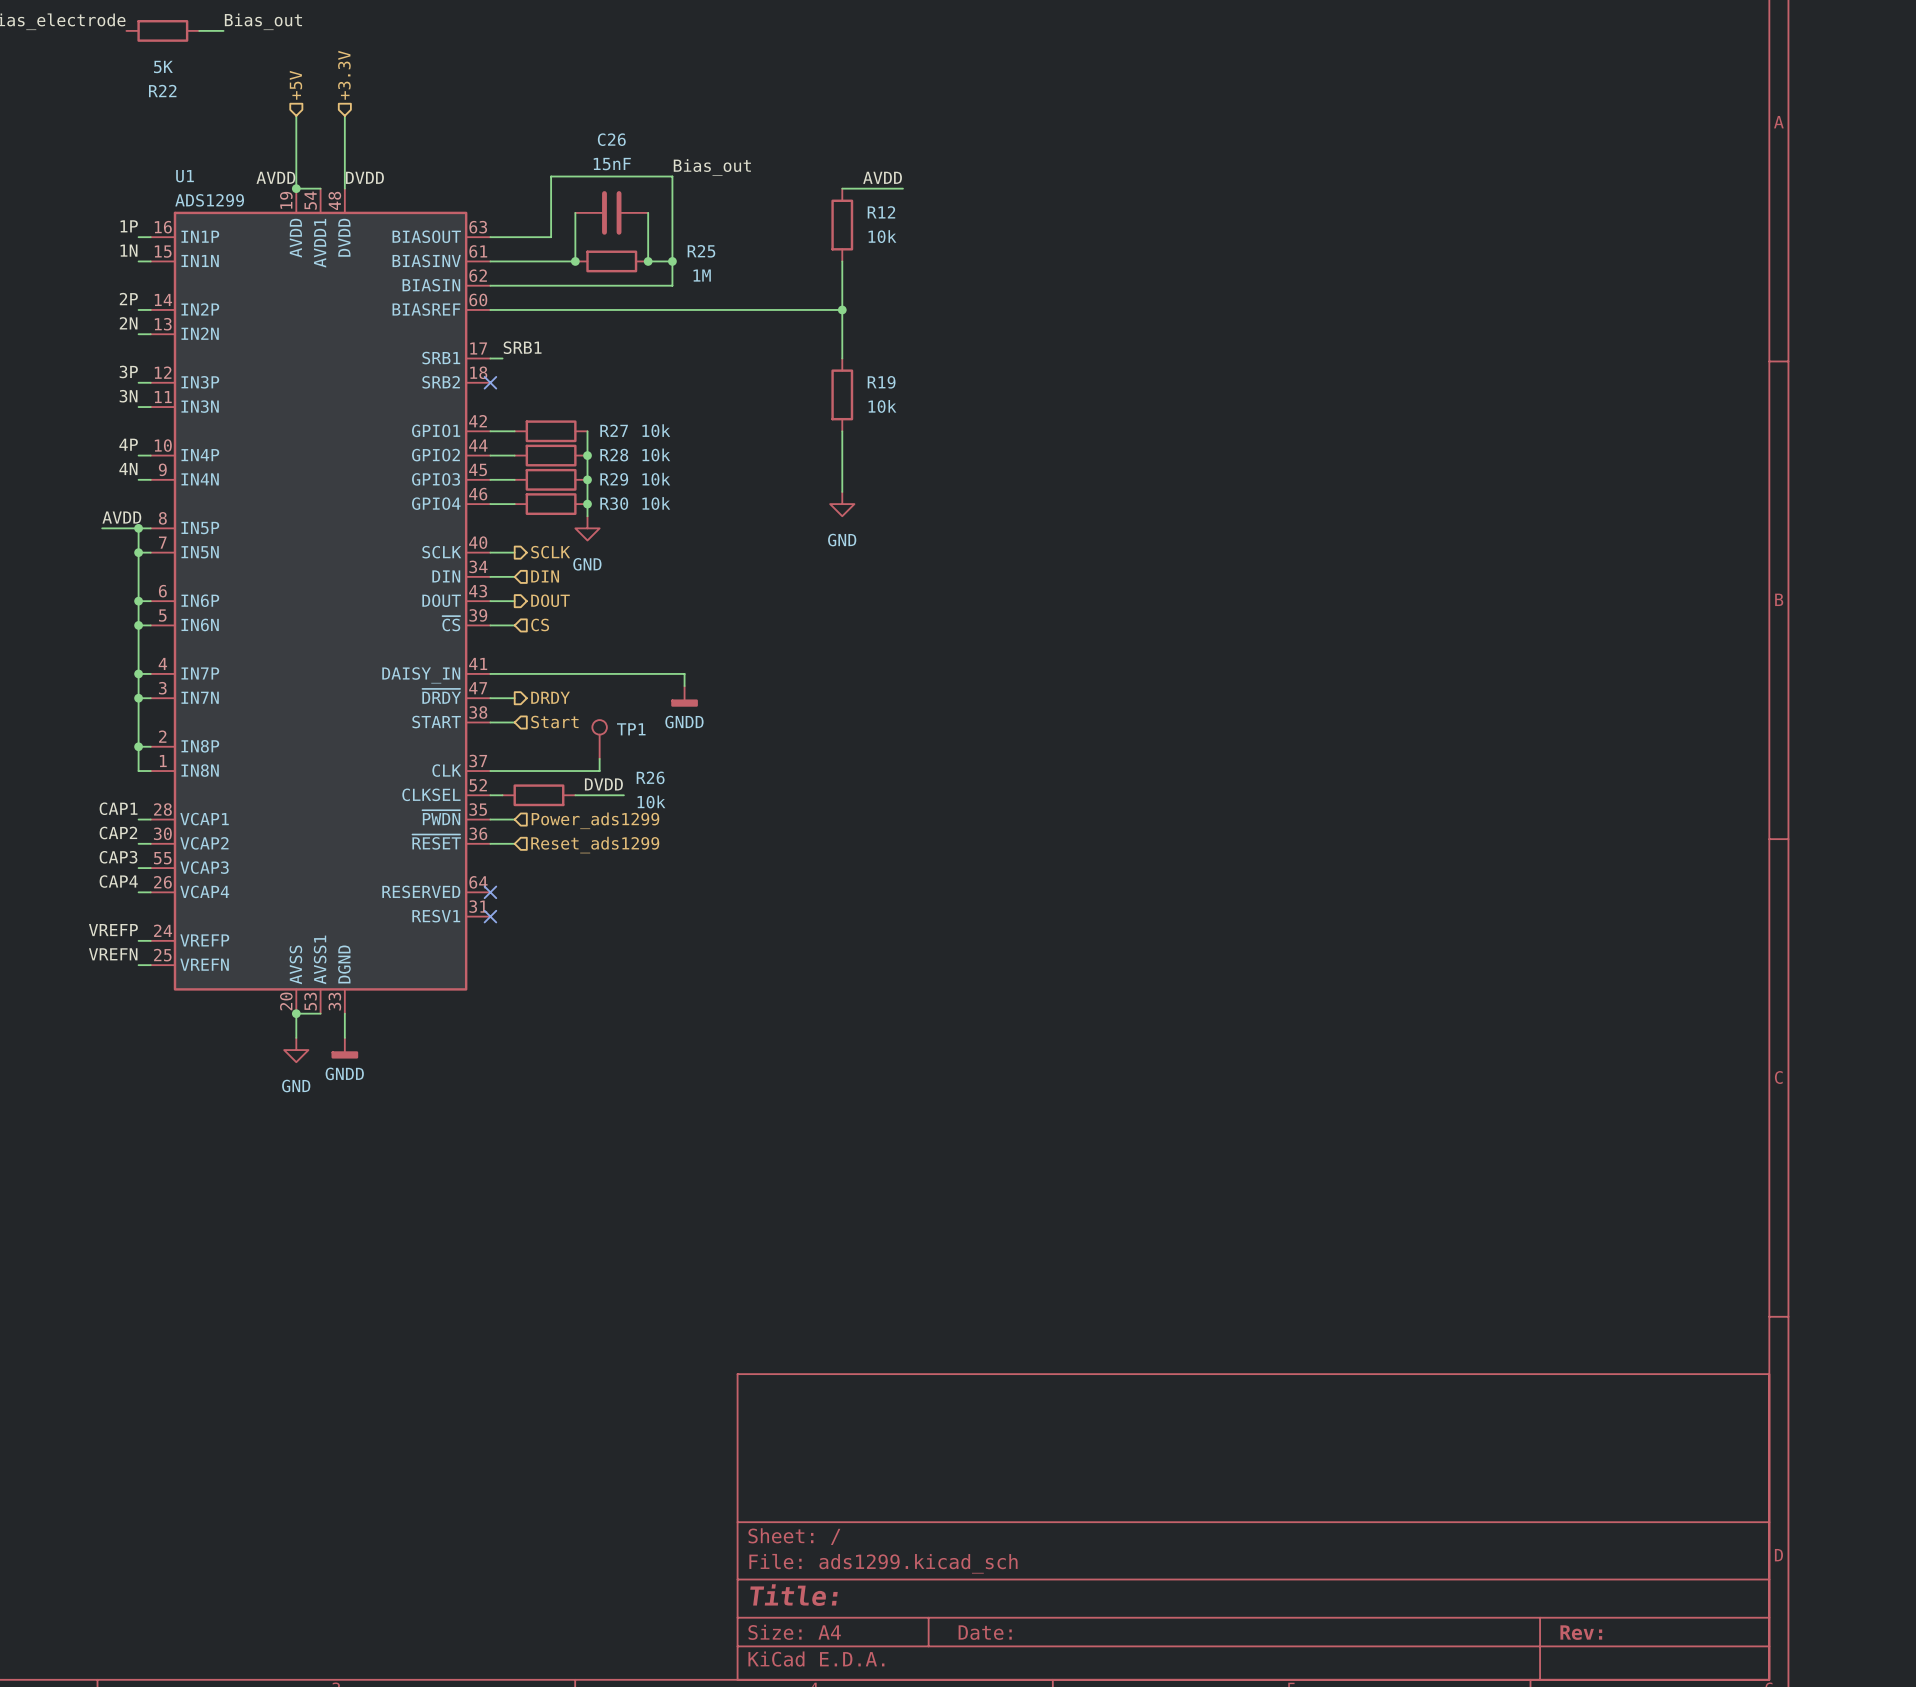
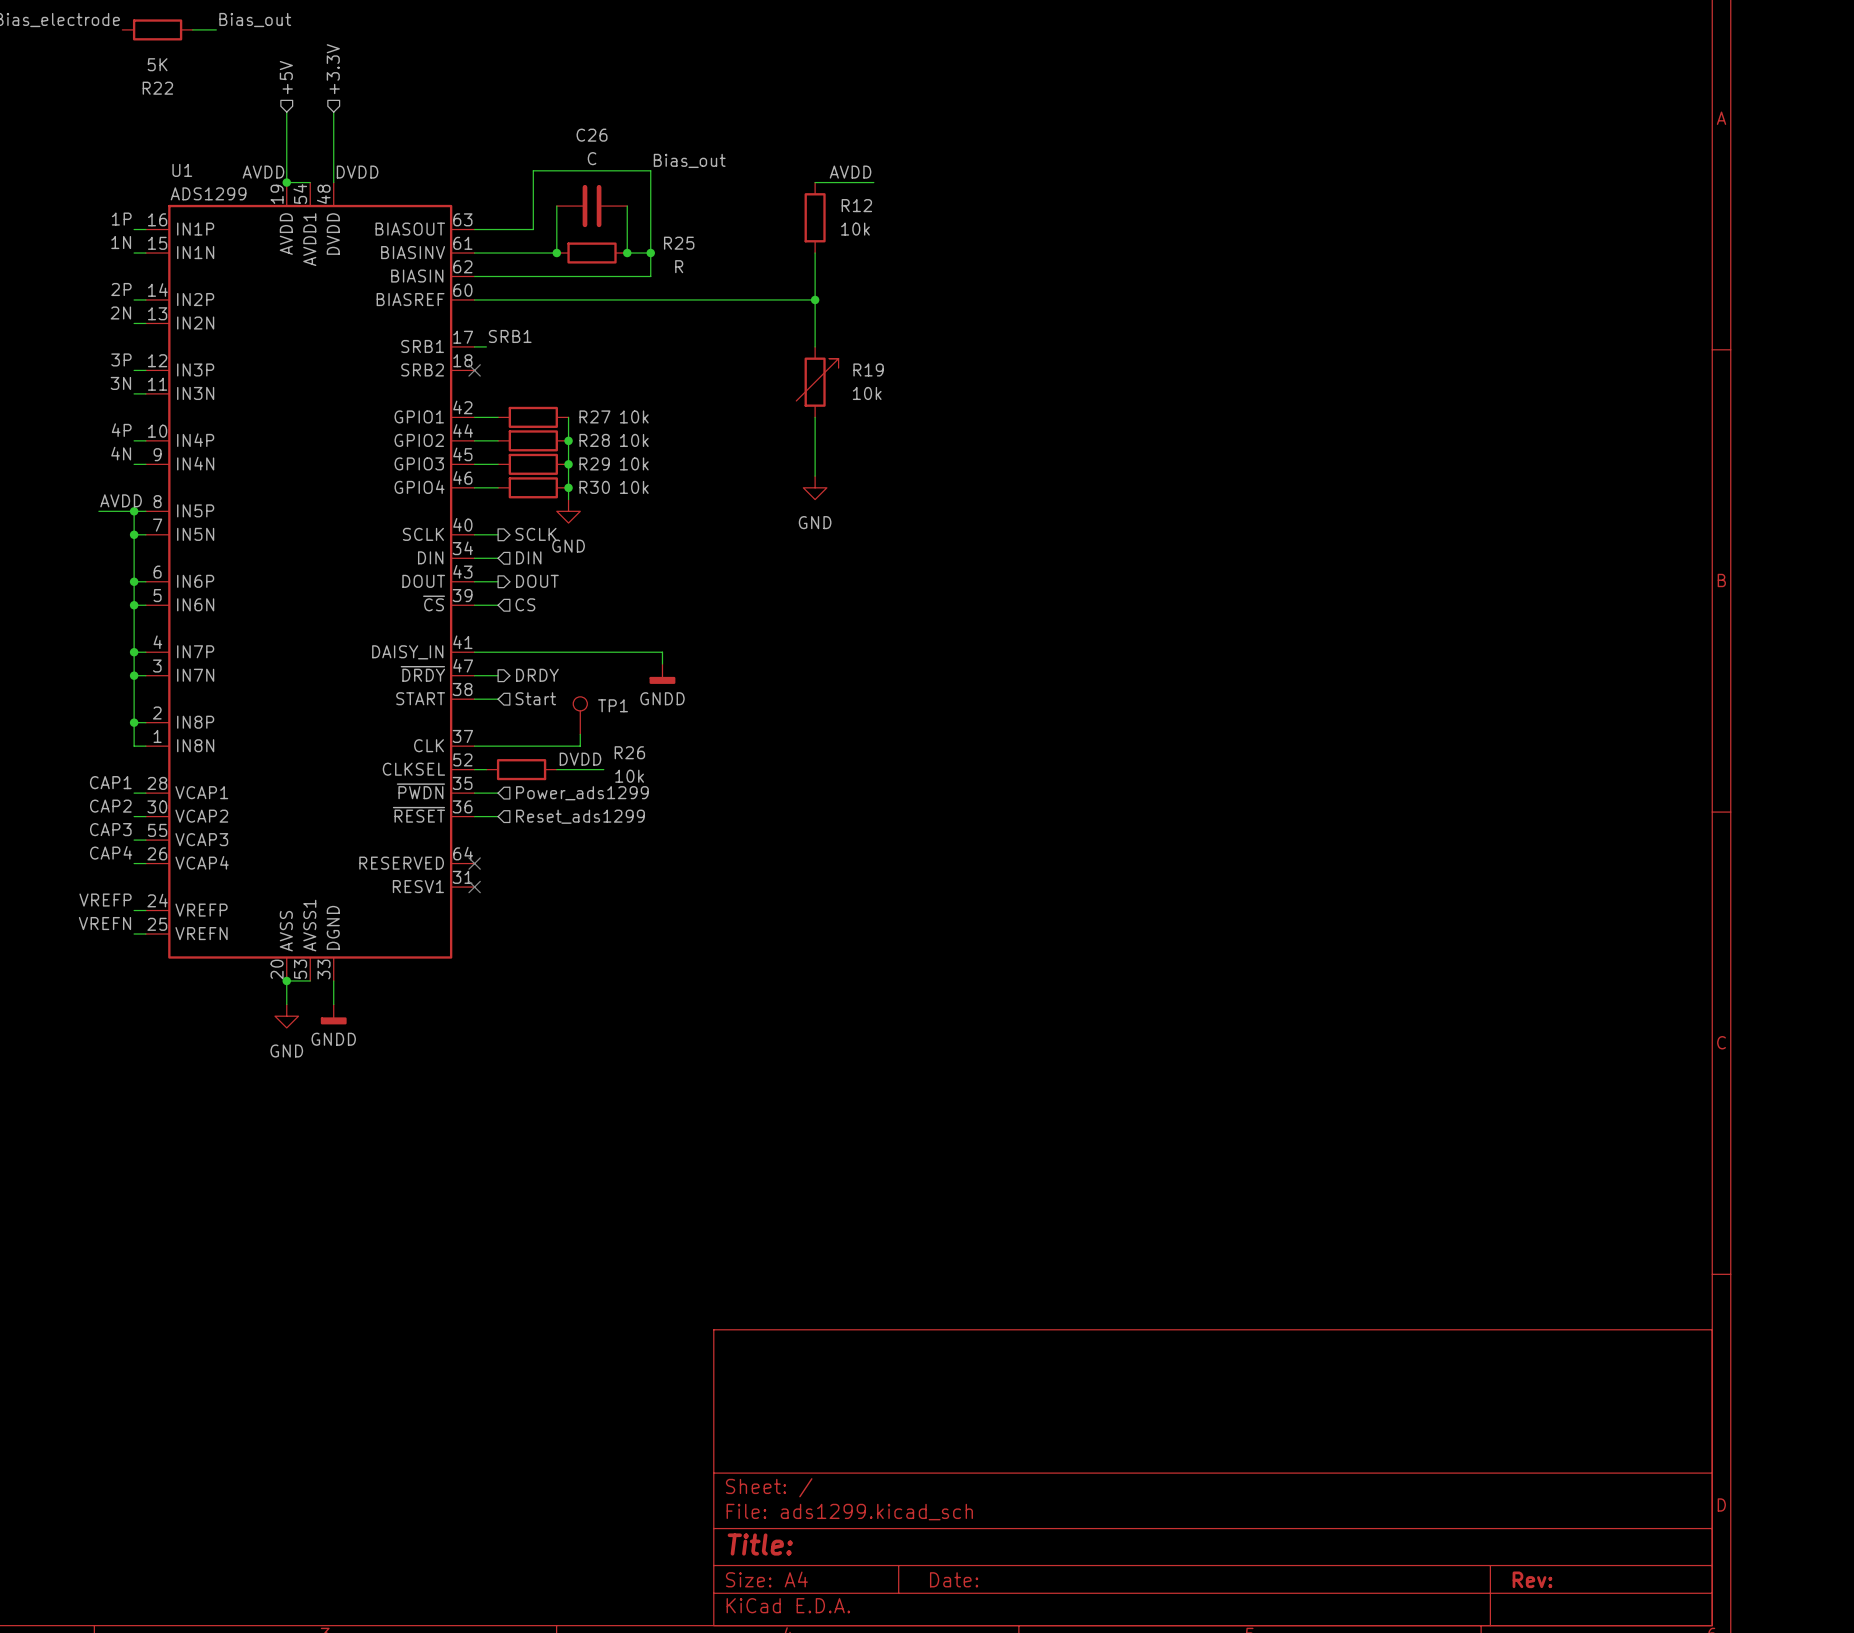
C26 value: 15nF (612, 164) -> C (592, 158)
R25 value: 1M (702, 275) -> R (679, 266)
R19 symbol: [831, 358, 854, 432] -> [796, 346, 839, 418]

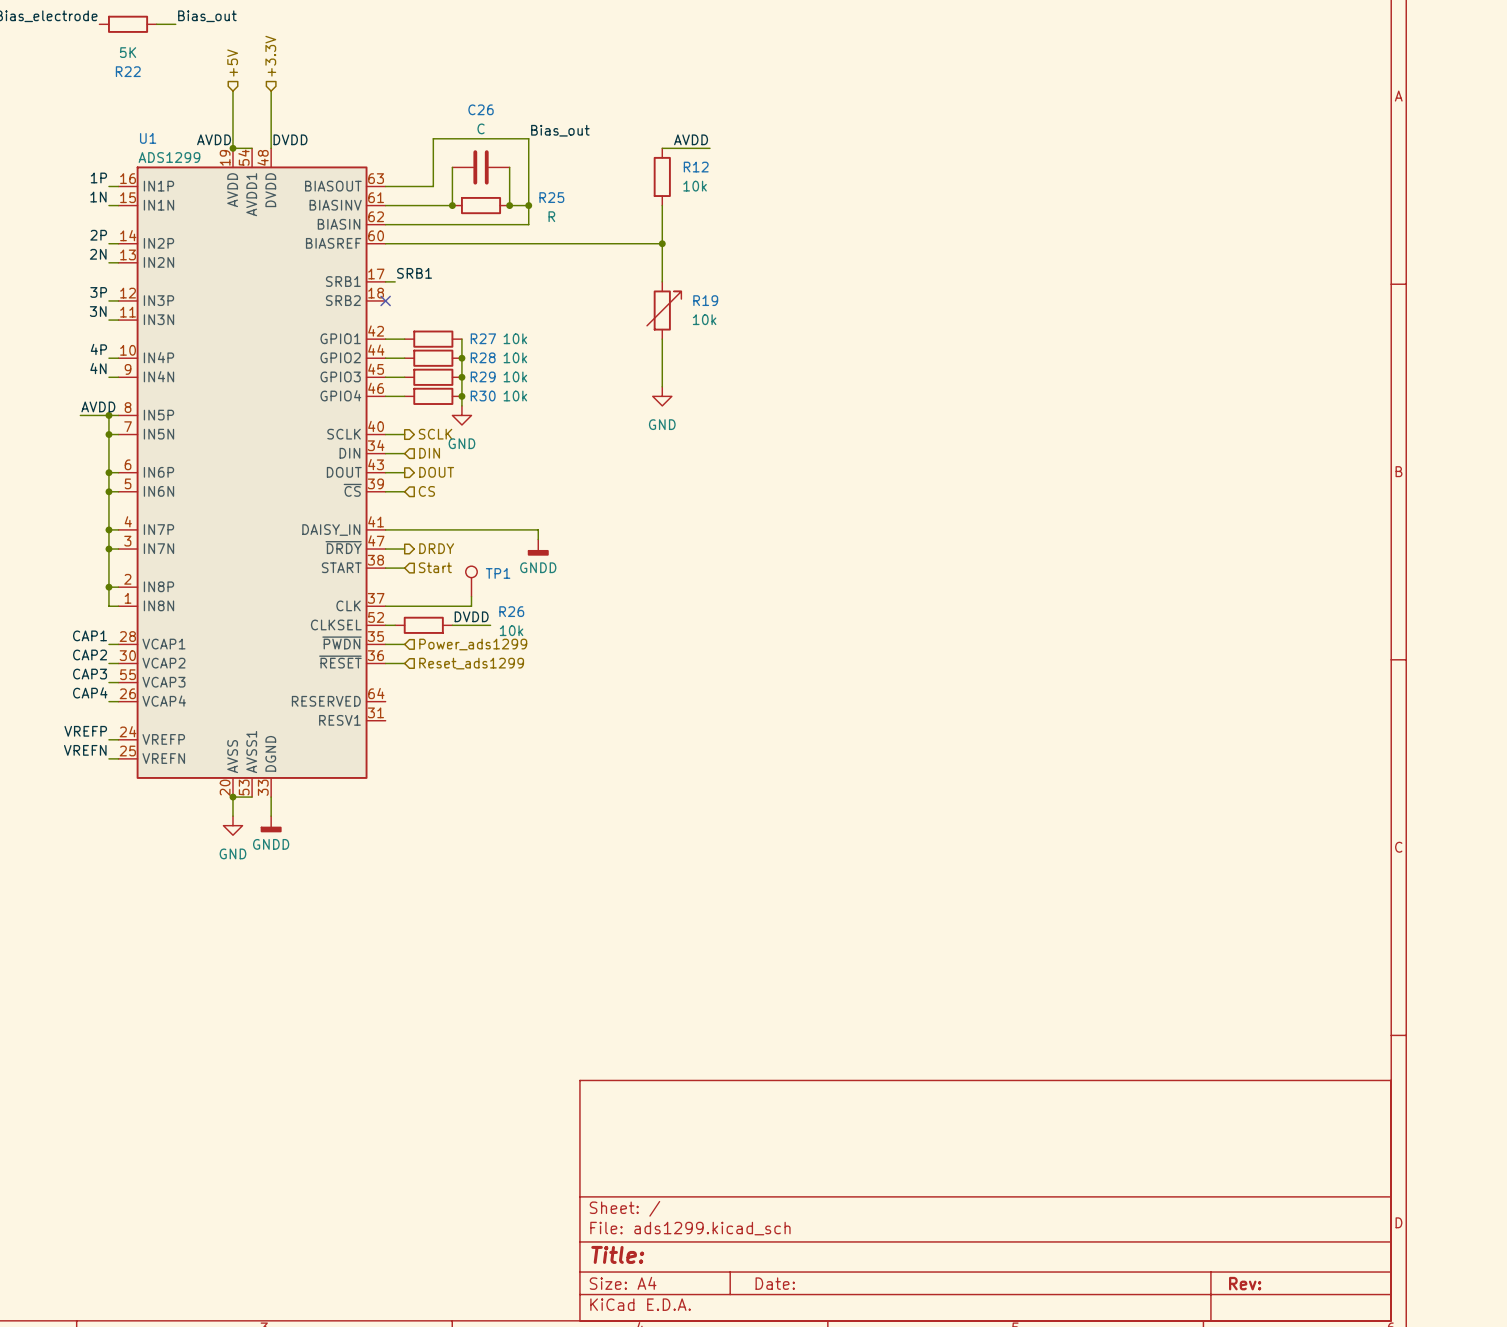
no-connect mark: (474, 863) -> none
no-connect mark: (474, 887) -> none

